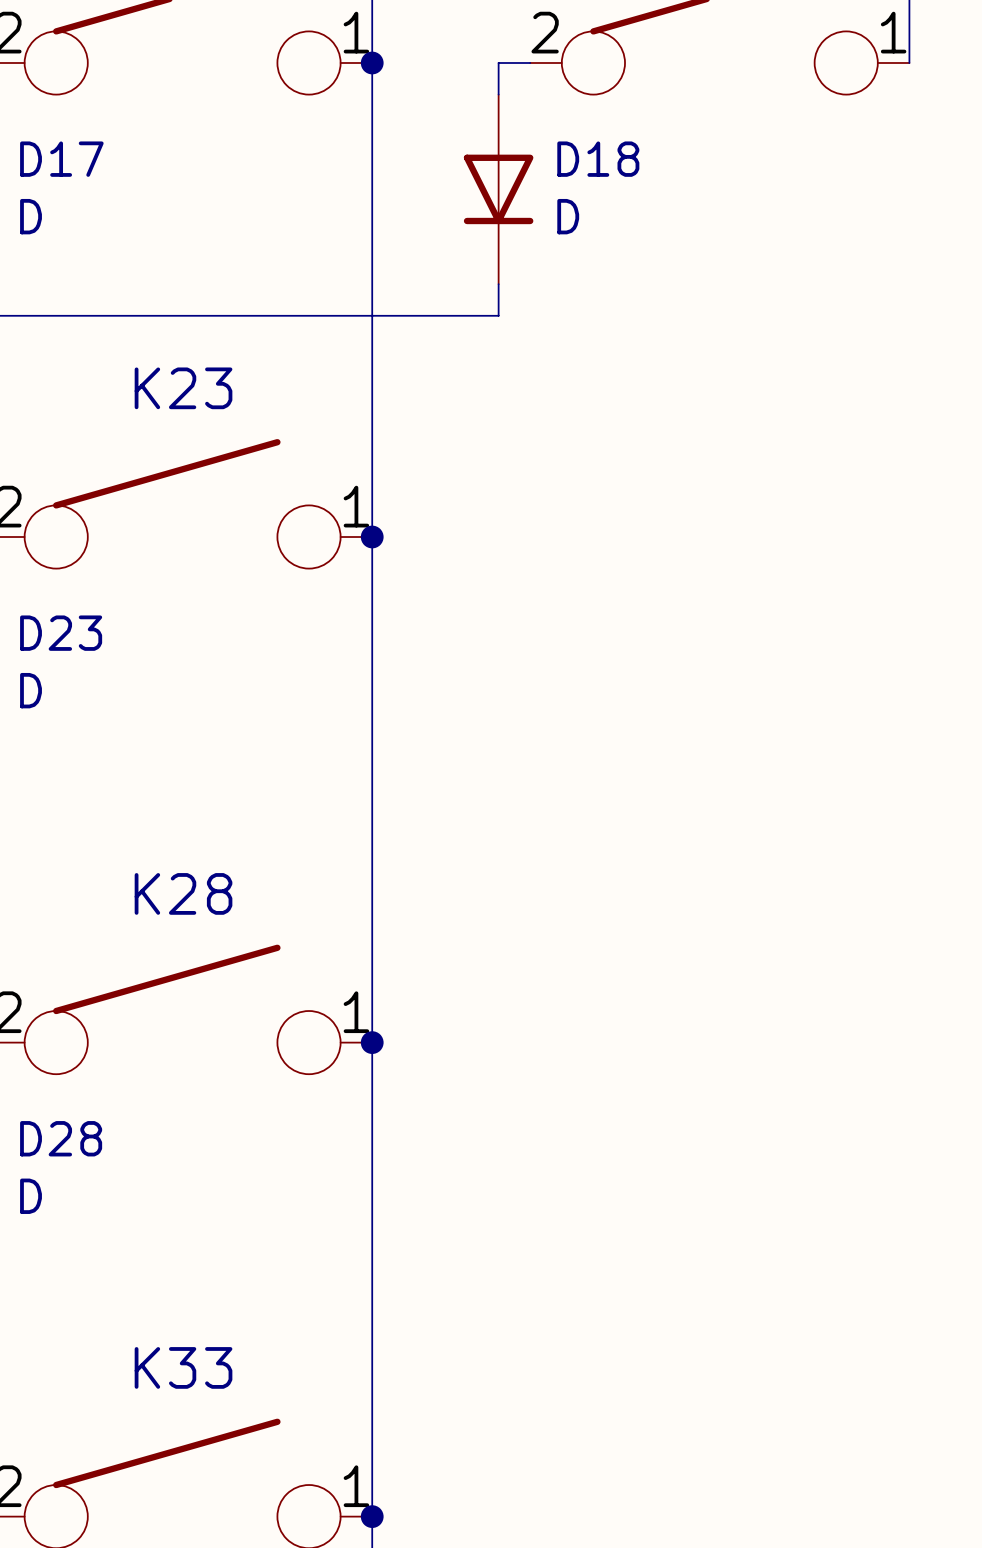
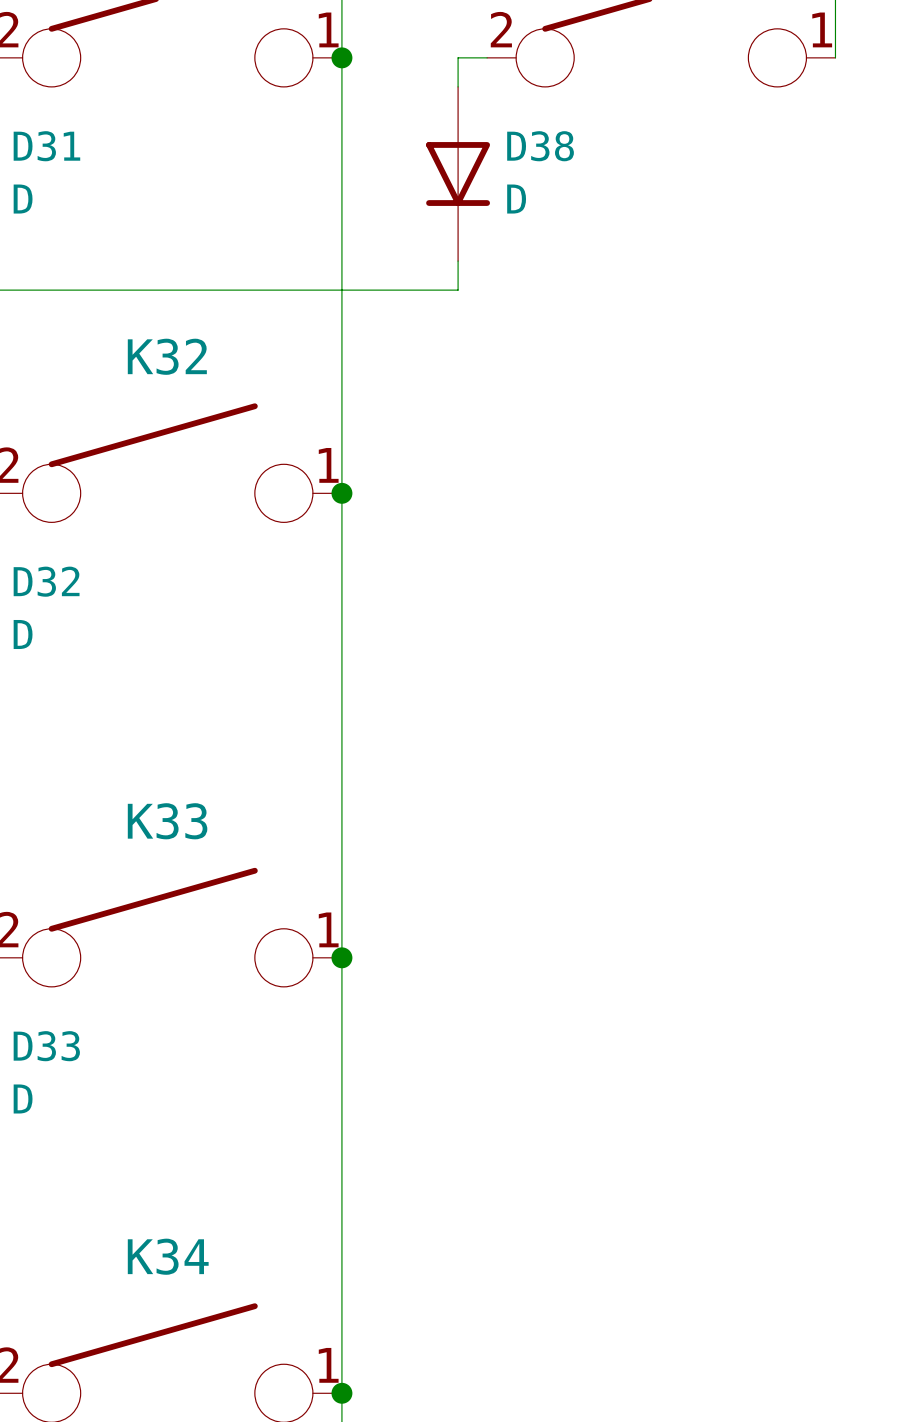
D17 name: D17 (61, 159) -> D31 (46, 146)
D18 name: D18 (598, 159) -> D38 (540, 146)
K23 name: K23 (183, 388) -> K32 (167, 356)
D23 name: D23 (61, 633) -> D32 (46, 581)
K28 name: K28 (183, 893) -> K33 (167, 821)
D28 name: D28 (61, 1138) -> D33 (46, 1046)
K33 name: K33 (183, 1367) -> K34 (168, 1256)

